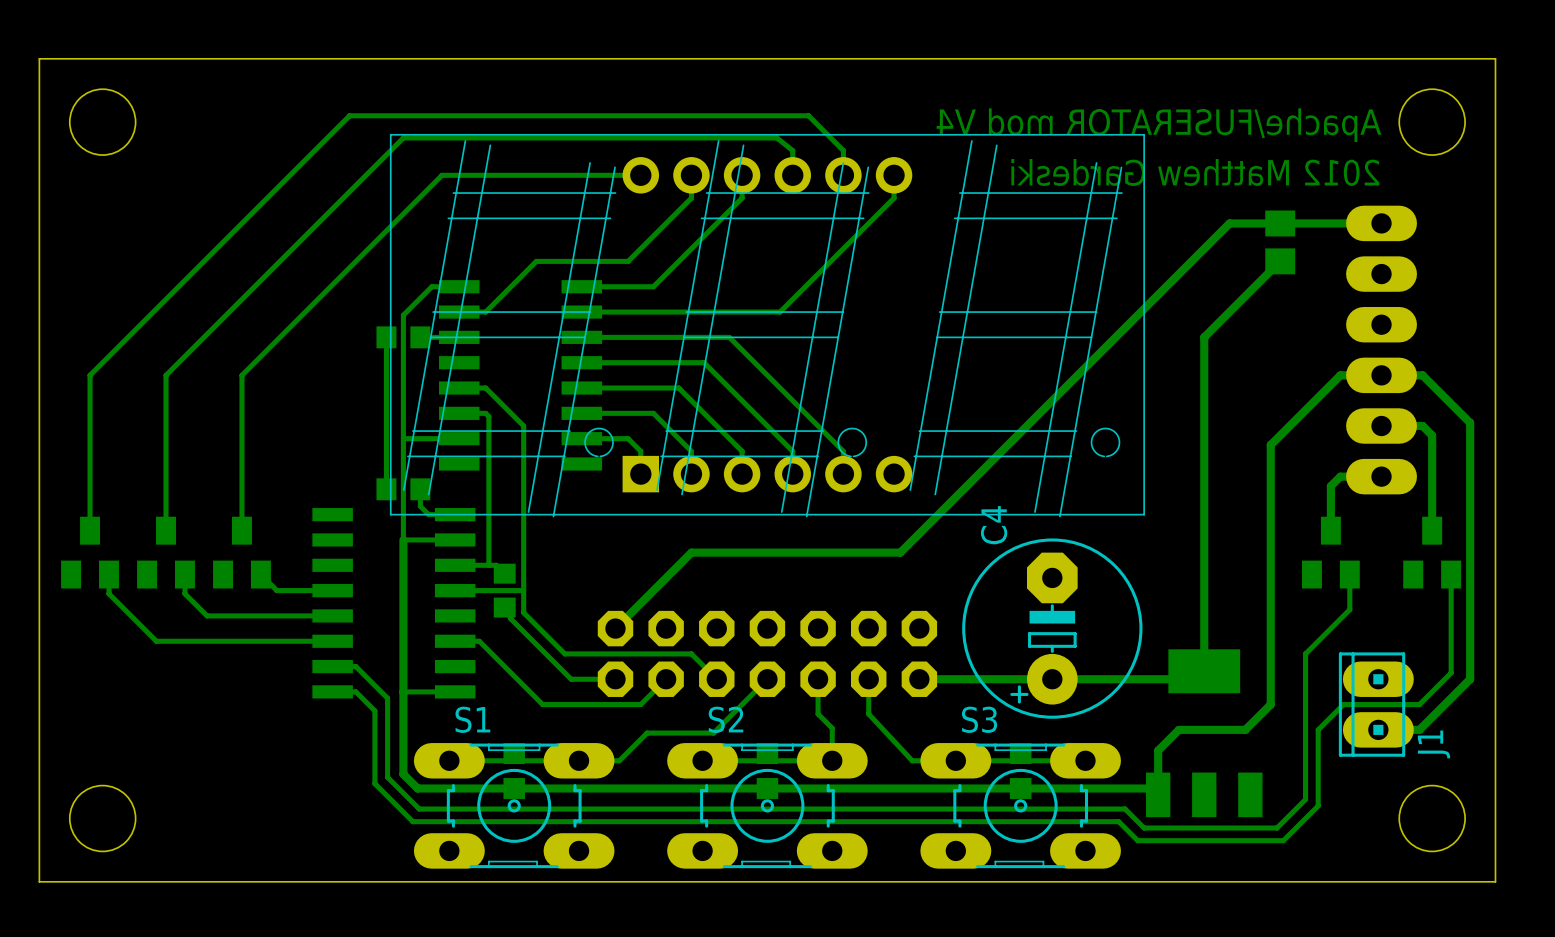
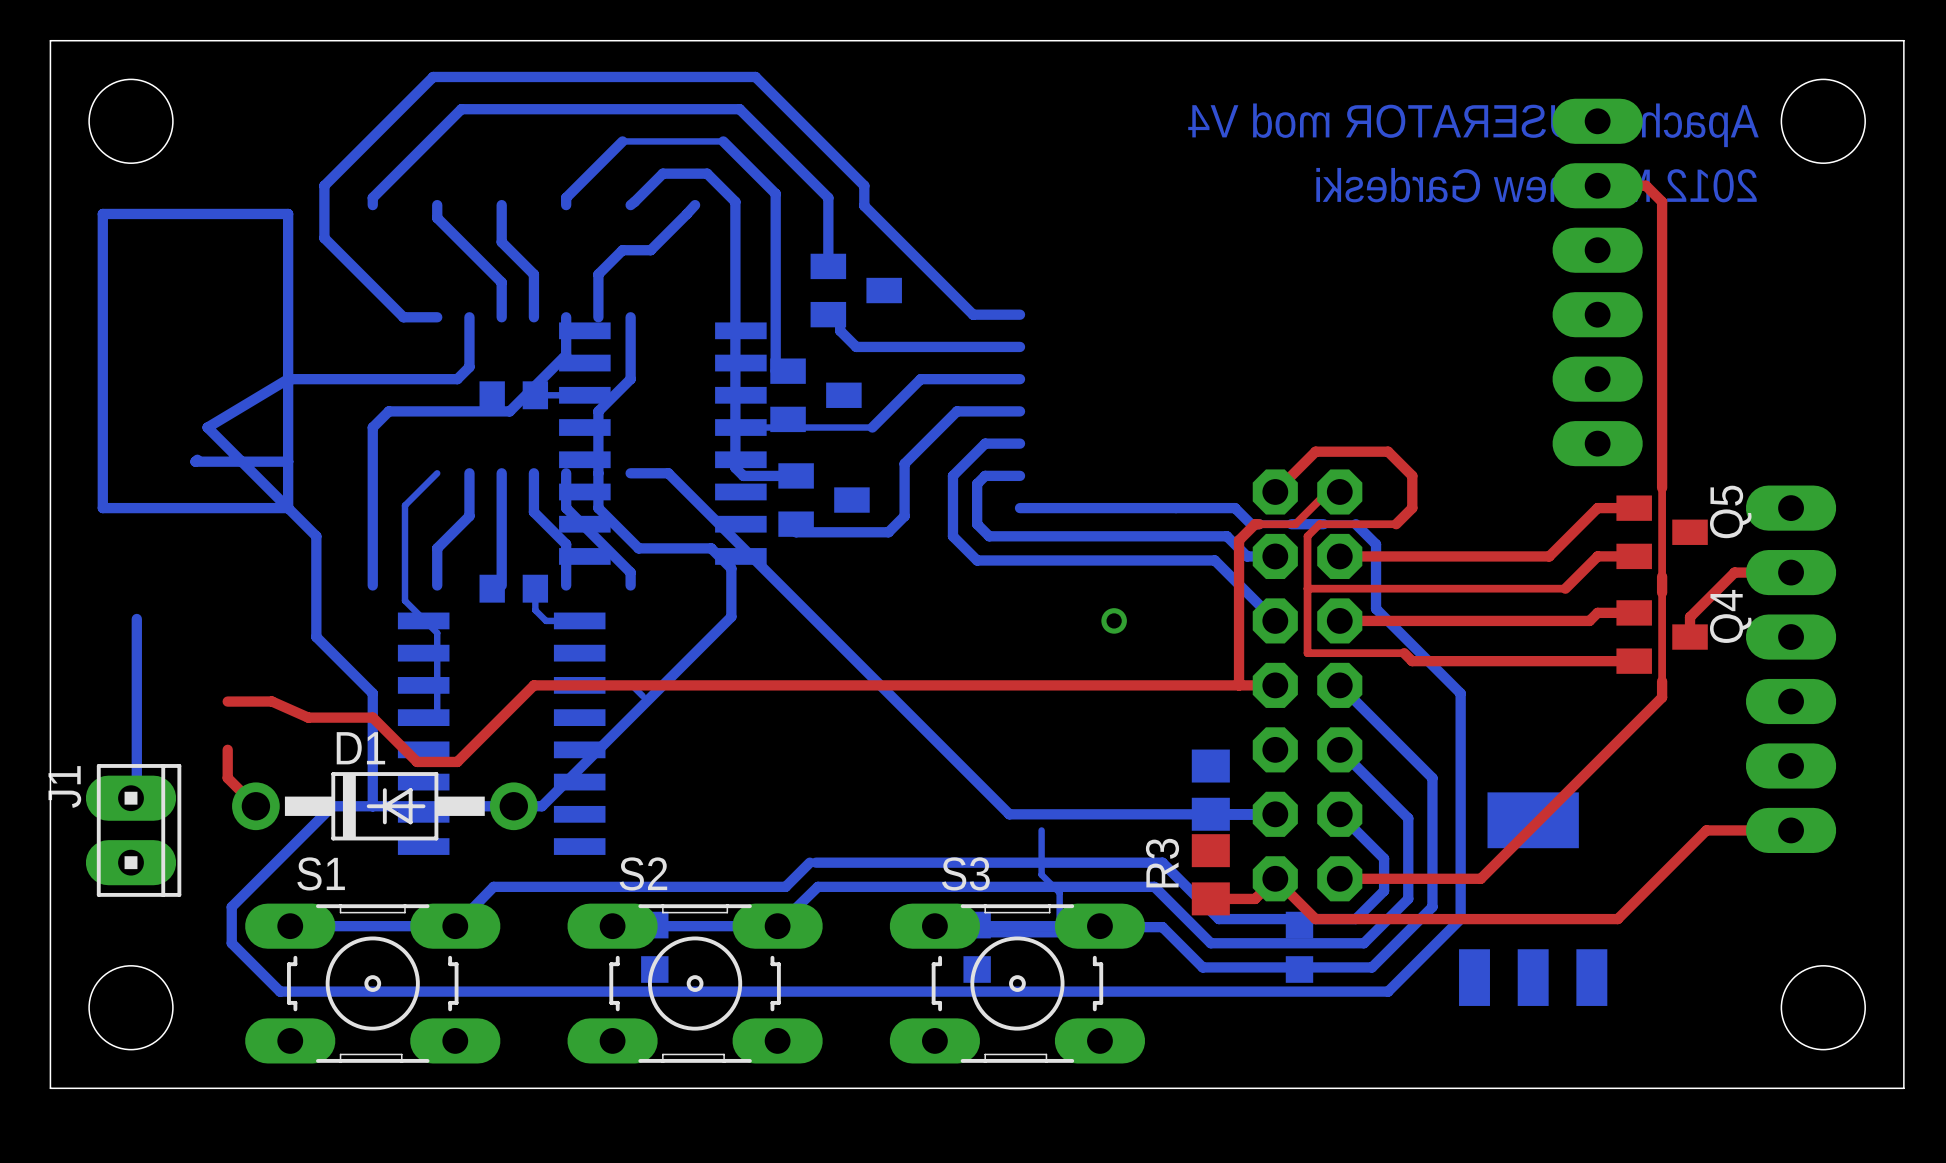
bottom track: (488, 137) (403, 137) (166, 375) (166, 530) -> (622, 141) (566, 197) (566, 205)
bottom track: (568, 137) (776, 137) (792, 150) (792, 175) -> (723, 141) (775, 193) (775, 371) (796, 371) (788, 371)
top track: none -> (1597, 185) (1645, 185) (1662, 201) (1662, 697) (1480, 878) (1339, 878)
bottom track: (640, 175) (442, 175) (241, 375) (241, 530) -> none
bottom track: (691, 175) (691, 198) (628, 261) (536, 261) (485, 312) (459, 312) -> none
bottom track: (742, 175) (742, 198) (653, 286) (581, 286) -> none
bottom track: (843, 175) (843, 150) (808, 115) (349, 115) (90, 375) (90, 530) -> none
bottom track: (894, 175) (894, 198) (780, 312) (581, 312) -> none
bottom track: none -> (372, 205) (372, 197) (461, 109) (739, 109) (828, 197) (828, 266)
bottom track: none -> (437, 205) (437, 218) (501, 282) (501, 317)
bottom track: none -> (501, 205) (501, 242) (533, 274) (533, 317)
bottom track: none -> (630, 205) (662, 173) (707, 173) (735, 201) (735, 467) (743, 475) (796, 475)
bottom track: none -> (695, 205) (650, 250) (622, 250) (598, 274) (598, 317)
bottom track: none -> (102, 213) (102, 508) (288, 508) (288, 213) (102, 213)
bottom track: (1381, 223) (1229, 223) (900, 552) (691, 552) (615, 628) -> none
part: (1280, 242) -> none
part: none -> (1597, 282)
part: none -> (856, 290)
bottom track: (1280, 261) (1204, 337) (1204, 671) (1196, 679) (919, 679) -> none
bottom track: none -> (828, 314) (840, 314) (840, 330) (856, 346) (1020, 346)
bottom track: none -> (1020, 314) (973, 314) (864, 205) (864, 185) (755, 76) (433, 76) (324, 185) (324, 238) (403, 317) (437, 317)
bottom track: none -> (469, 317) (469, 367) (457, 379) (288, 379) (207, 427) (316, 536) (316, 637) (372, 693) (372, 806)
bottom track: none -> (566, 317) (566, 354) (509, 411) (388, 411) (372, 427) (372, 585)
bottom track: none -> (630, 317) (630, 379) (598, 411) (598, 508) (638, 548) (711, 548) (731, 568) (731, 616) (541, 806) (332, 806) (231, 906) (231, 943) (280, 991) (1388, 991) (1460, 919) (1460, 693) (1376, 608) (1376, 544) (1355, 524) (1251, 524) (1235, 508) (1020, 508)
bottom track: (459, 286) (431, 286) (403, 315) (403, 539) -> none
part: (767, 325) -> none
bottom track: (386, 337) (386, 489) -> none
bottom track: (581, 337) (729, 337) (843, 451) (843, 474) -> none
part: none -> (815, 395)
bottom track: none -> (1020, 411) (956, 411) (904, 463) (904, 516) (888, 532) (796, 532) (796, 524)
part: (1381, 350) -> none
bottom track: (685, 362) (704, 362) (792, 451) (792, 474) -> (872, 427) (920, 379) (1020, 379)
bottom track: none -> (1020, 443) (985, 443) (952, 475) (952, 536) (977, 560) (1214, 560) (1275, 620)
bottom track: none -> (197, 459) (195, 461) (288, 461)
bottom track: (459, 388) (485, 388) (523, 426) (523, 612) (564, 653) (691, 653) (716, 679) -> none
bottom track: (581, 388) (678, 388) (742, 451) (742, 474) -> none
bottom track: none -> (437, 473) (404, 505) (404, 600) (437, 633) (437, 717)
bottom track: none -> (469, 473) (469, 516) (437, 548) (437, 585)
bottom track: none -> (501, 473) (501, 585)
bottom track: none -> (533, 473) (533, 512) (566, 544) (566, 585)
bottom track: none -> (566, 473) (566, 508) (630, 572) (630, 585)
bottom track: none -> (630, 473) (668, 473) (1009, 814) (1275, 814)
bottom track: none -> (1020, 475) (985, 475) (977, 483) (977, 524) (989, 536) (1226, 536) (1247, 556) (1275, 556)
bottom track: (459, 413) (485, 413) (488, 416) (488, 565) -> none
bottom track: (581, 413) (653, 413) (691, 451) (691, 474) -> none
top track: none -> (1275, 491) (1315, 451) (1388, 451) (1412, 475) (1412, 508) (1396, 524) (1319, 524) (1307, 536) (1307, 653) (1404, 653) (1412, 661) (1634, 661)
top track: none -> (1339, 491) (1327, 491) (1295, 524) (1255, 524) (1239, 540) (1239, 685)
part: none -> (824, 500)
top track: none -> (1634, 508) (1597, 508) (1549, 556) (1339, 556)
bottom track: (1381, 426) (1422, 426) (1432, 435) (1432, 530) -> none
bottom track: (403, 438) (459, 438) -> none
bottom track: (581, 438) (628, 438) (640, 451) (640, 474) -> none
top track: none -> (1634, 556) (1597, 556) (1565, 588) (1307, 588)
bottom track: (1381, 476) (1340, 476) (1330, 486) (1330, 530) -> none
top track: none -> (1791, 572) (1734, 572) (1690, 617) (1690, 637)
top track: none -> (1634, 612) (1597, 612) (1589, 620) (1339, 620)
bottom track: none -> (136, 618) (136, 792) (131, 798)
via: none -> (1114, 620)
bottom track: (403, 539) (455, 539) -> none
bottom track: (403, 539) (403, 774) (417, 788) (1151, 788) (1158, 794) (1158, 750) (1178, 729) (1245, 729) (1270, 704) (1270, 444) (1340, 375) (1422, 375) (1470, 422) (1470, 679) (1419, 729) (1378, 729) -> none
part: (90, 552) -> none
part: (166, 552) -> none
part: (241, 552) -> none
Q5 side: bottom (1330, 552) -> top (1662, 532)
part: none -> (1791, 669)
Q4 side: bottom (1432, 552) -> top (1662, 637)
top track: none -> (1275, 685) (533, 685) (457, 761) (417, 761) (372, 717) (308, 717) (271, 701) (227, 701)
bottom track: none -> (1339, 685) (1432, 778) (1432, 906) (1372, 967) (1202, 967) (1162, 927) (934, 926)
bottom track: (108, 574) (108, 593) (156, 641) (332, 641) -> none
bottom track: (184, 574) (184, 593) (207, 615) (332, 615) -> none
bottom track: (260, 574) (276, 590) (332, 590) -> none
bottom track: (1349, 574) (1349, 609) (1305, 653) (1305, 799) (1277, 828) (1144, 828) (1125, 809) (419, 809) (387, 777) (387, 698) (355, 666) (332, 666) -> none
bottom track: (1451, 574) (1451, 672) (1419, 704) (1343, 704) (1318, 729) (1318, 805) (1283, 840) (1137, 840) (1118, 821) (412, 821) (374, 783) (374, 710) (355, 691) (332, 691) -> none
bottom track: (455, 590) (523, 590) -> none
part: (504, 590) -> none
bottom track: (504, 607) (511, 619) (571, 679) (615, 679) -> none
top track: none -> (227, 749) (227, 778) (255, 806)
bottom track: none -> (1339, 749) (1408, 818) (1408, 898) (1363, 943) (1210, 943) (1154, 886) (817, 886) (777, 926) (612, 926)
C4: (1052, 628) -> none
bottom track: (455, 641) (479, 641) (542, 704) (636, 704) -> (290, 926) (455, 926) (493, 886) (785, 886) (809, 862)
part: none -> (1210, 790)
part rotation: 0° (767, 653) -> 90° clockwise (1307, 685)
part position: (767, 653) -> (1307, 685)
D1: none -> (384, 806)
bottom track: (666, 679) (640, 704) -> (1339, 814) (1384, 858) (1384, 890) (1355, 919) (1218, 919) (1162, 862) (815, 862)
bottom track: (767, 679) (713, 733) (647, 733) (619, 760) (515, 760) (514, 753) (513, 760) (449, 760) -> none
bottom track: (868, 679) (868, 714) (912, 760) (1019, 760) (1020, 753) (1021, 760) (1085, 760) -> none
top track: none -> (1791, 830) (1706, 830) (1617, 919) (1315, 919) (1275, 878) (1255, 898) (1210, 898)
bottom track: (403, 691) (455, 691) -> none
J1 rotation: 0° (1376, 704) -> 180° (133, 830)
J1 position: (1376, 704) -> (133, 830)
R3: none -> (1210, 874)
S1 position: (514, 805) -> (372, 983)
S2 position: (767, 805) -> (695, 983)
S3 position: (1020, 805) -> (1017, 983)

